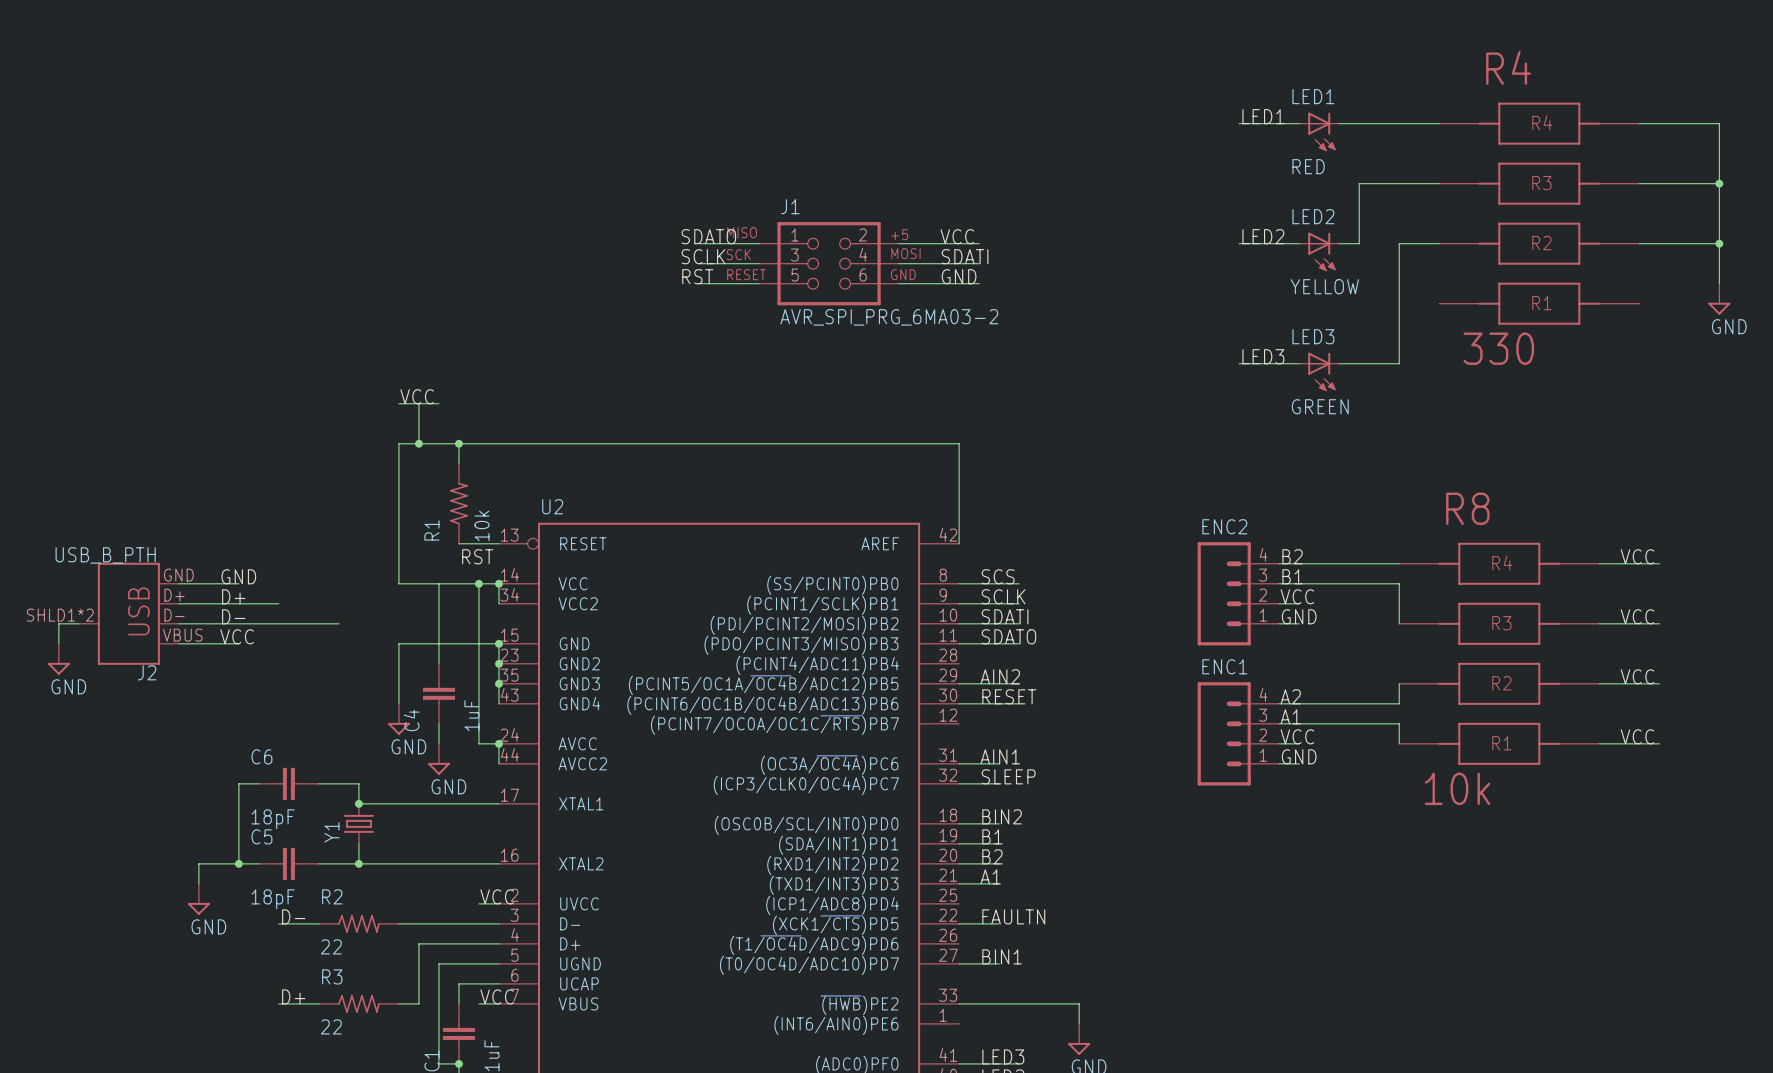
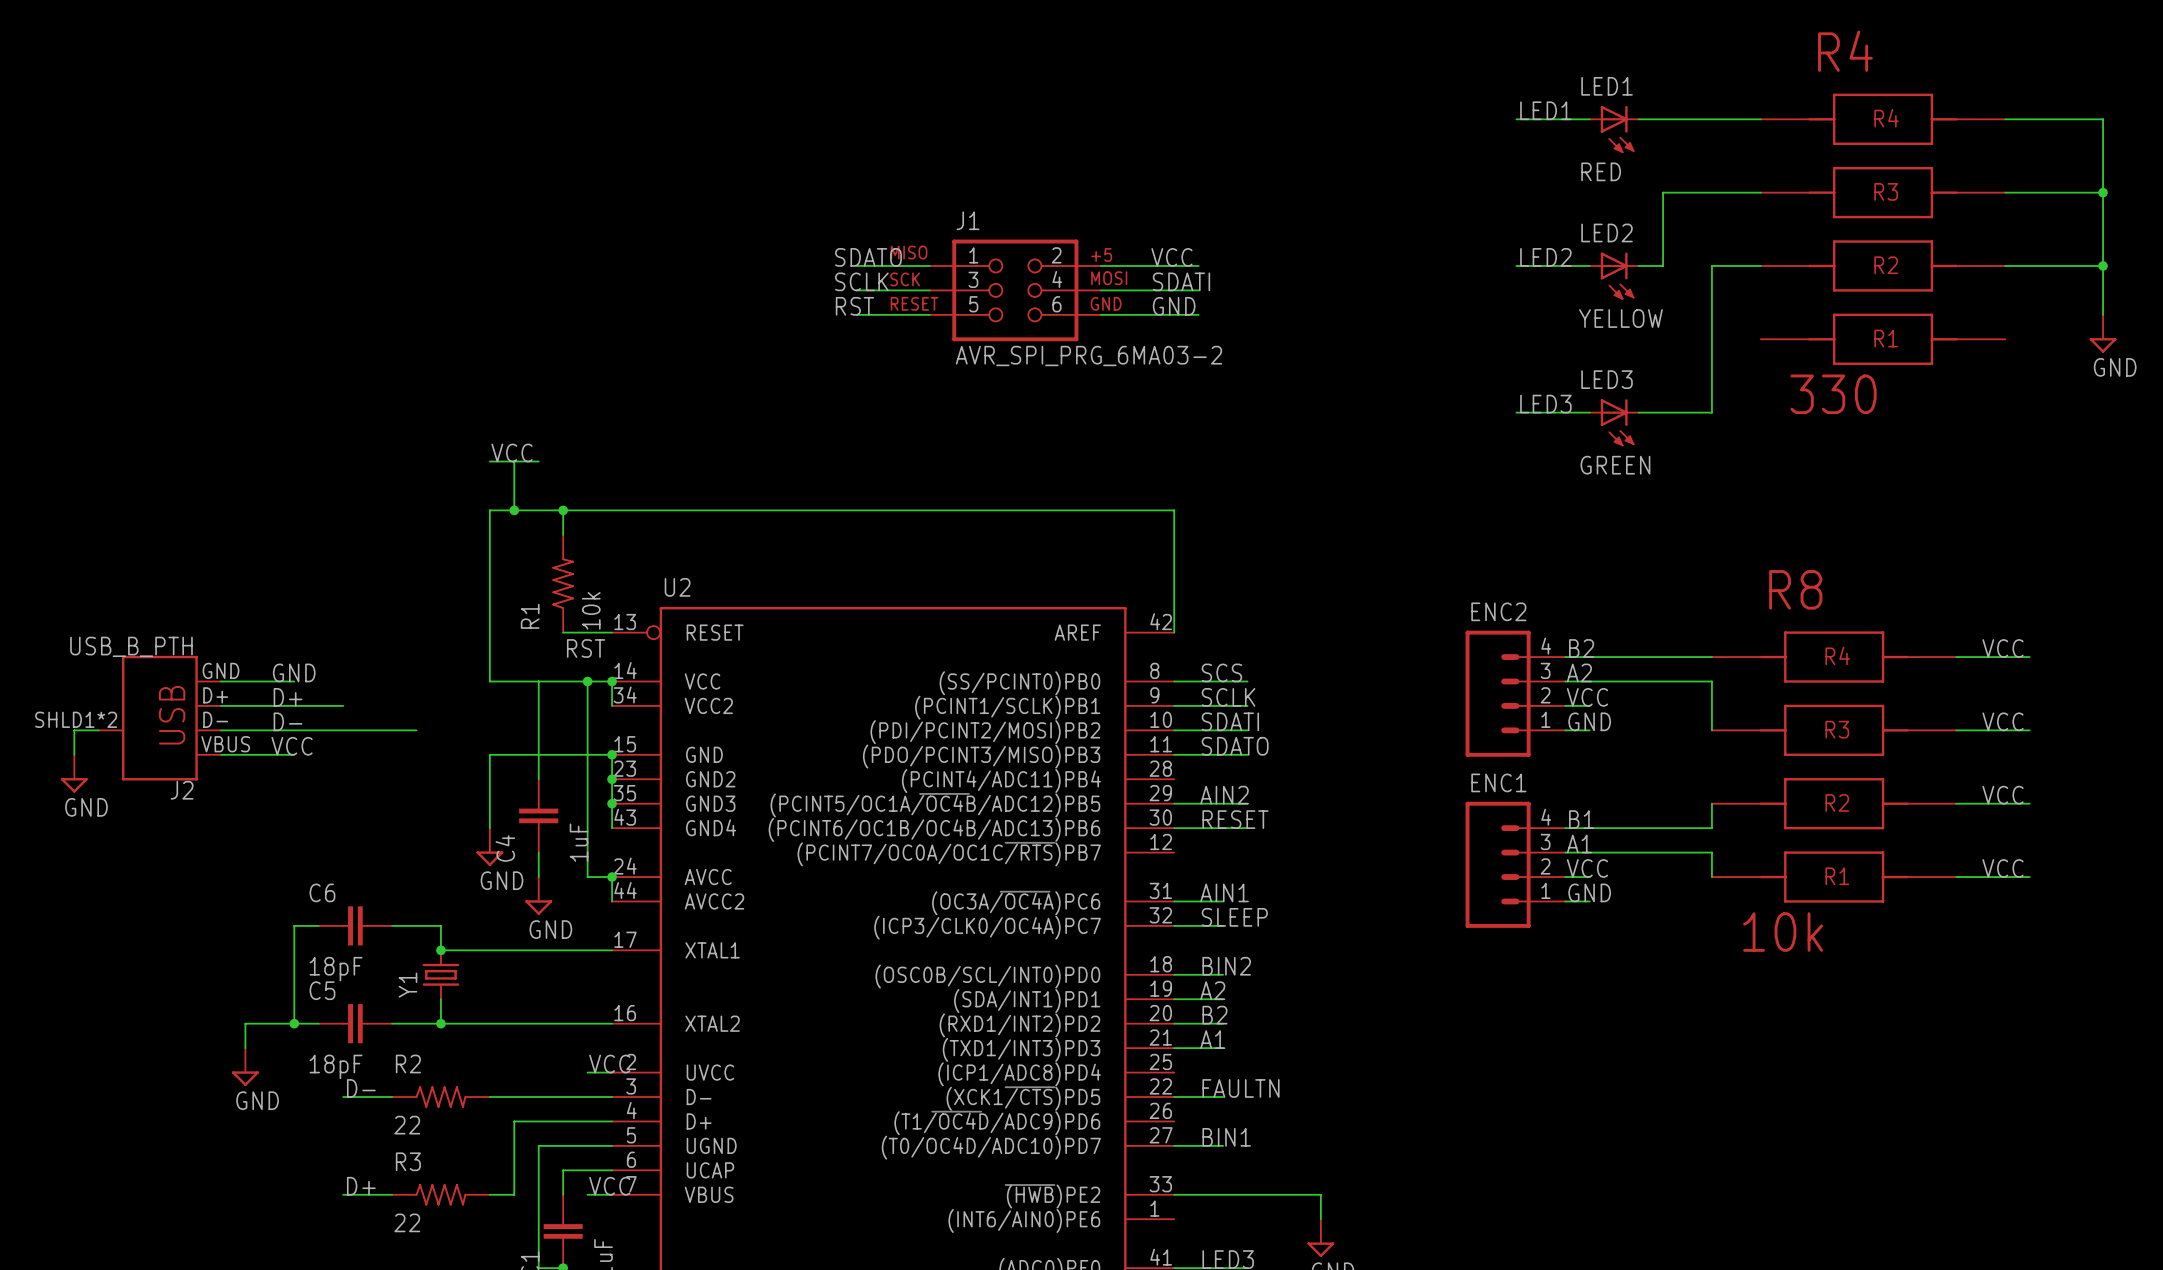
label: B1 (1292, 576) -> A2 (1579, 672)
label: A2 (1290, 696) -> B1 (1581, 819)
label: B1 (992, 836) -> A2 (1212, 990)

